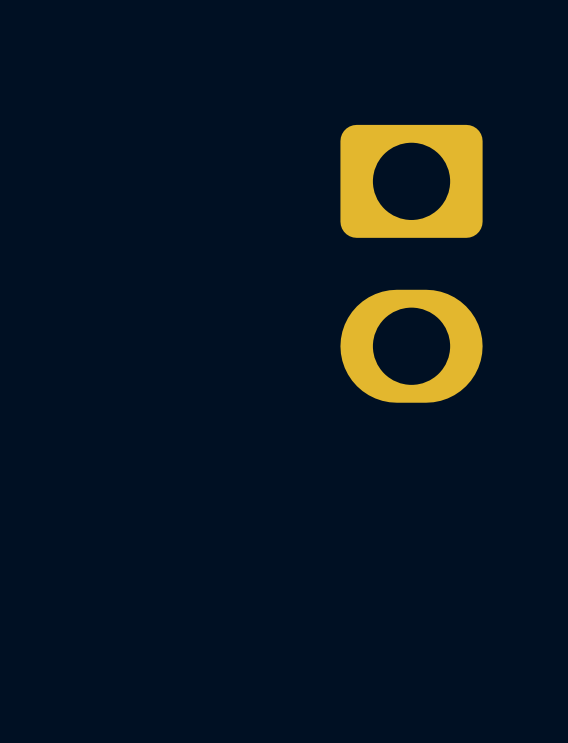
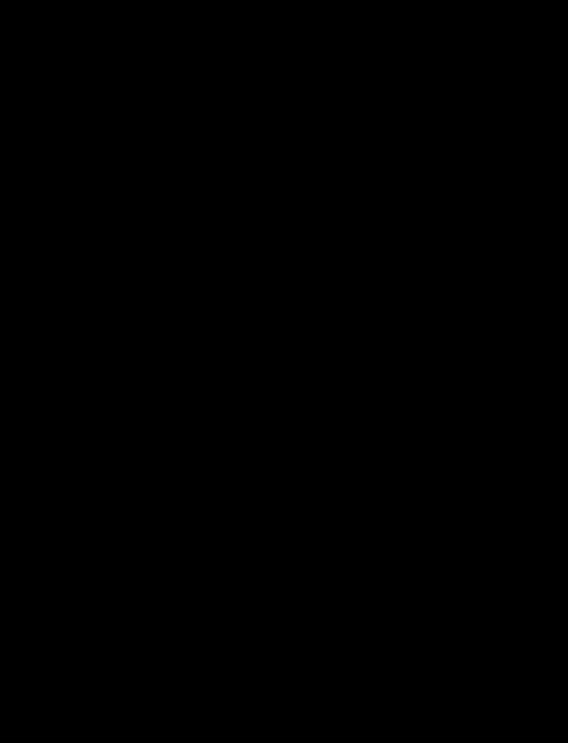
part: (411, 263) -> none

